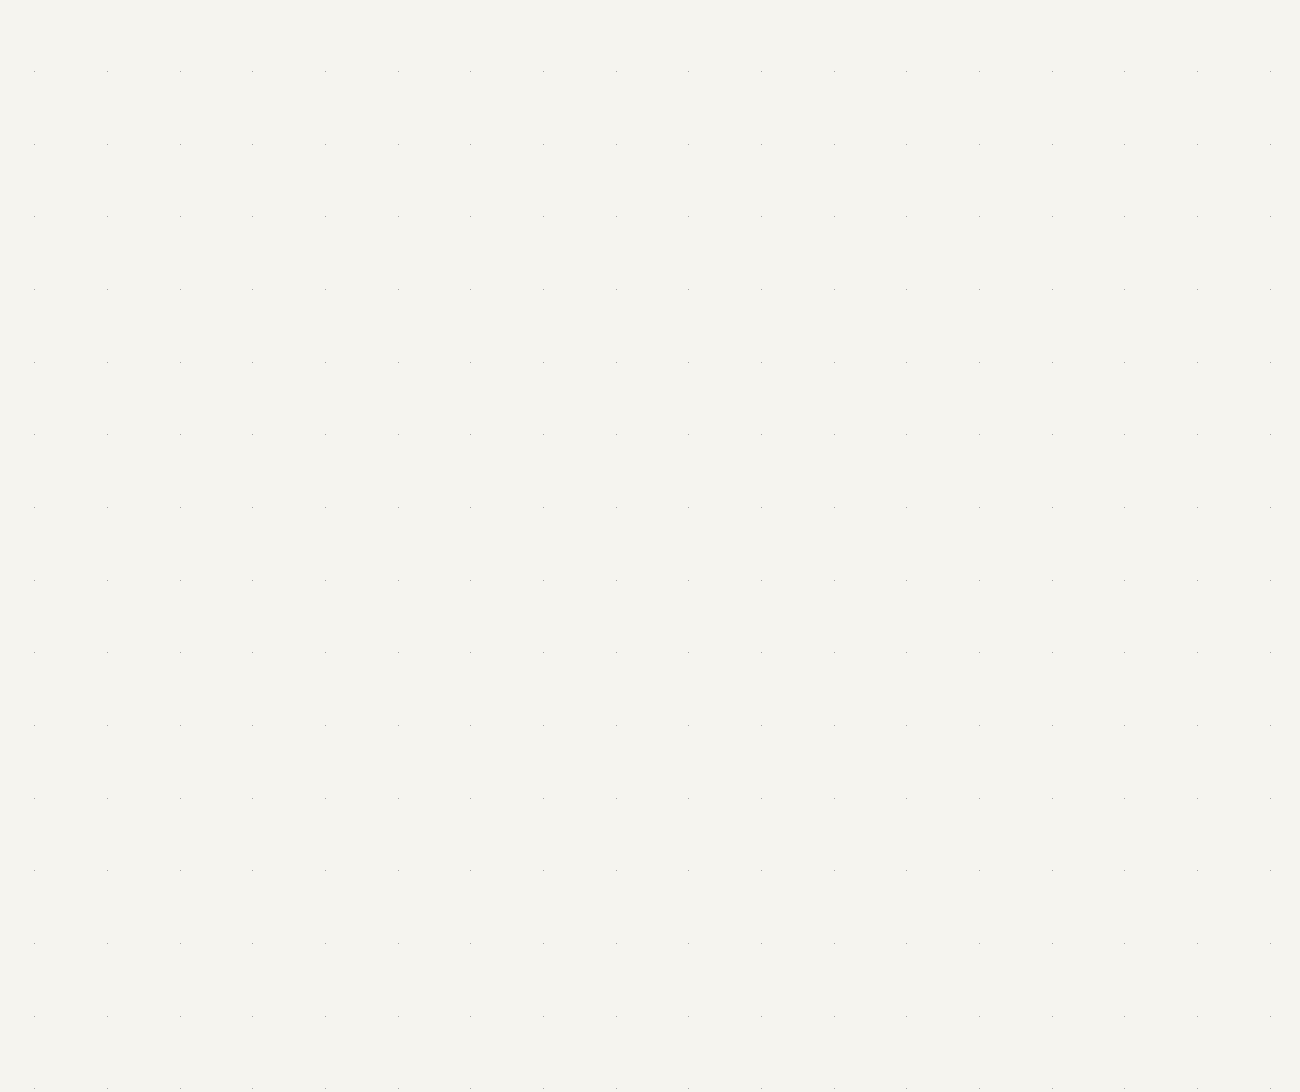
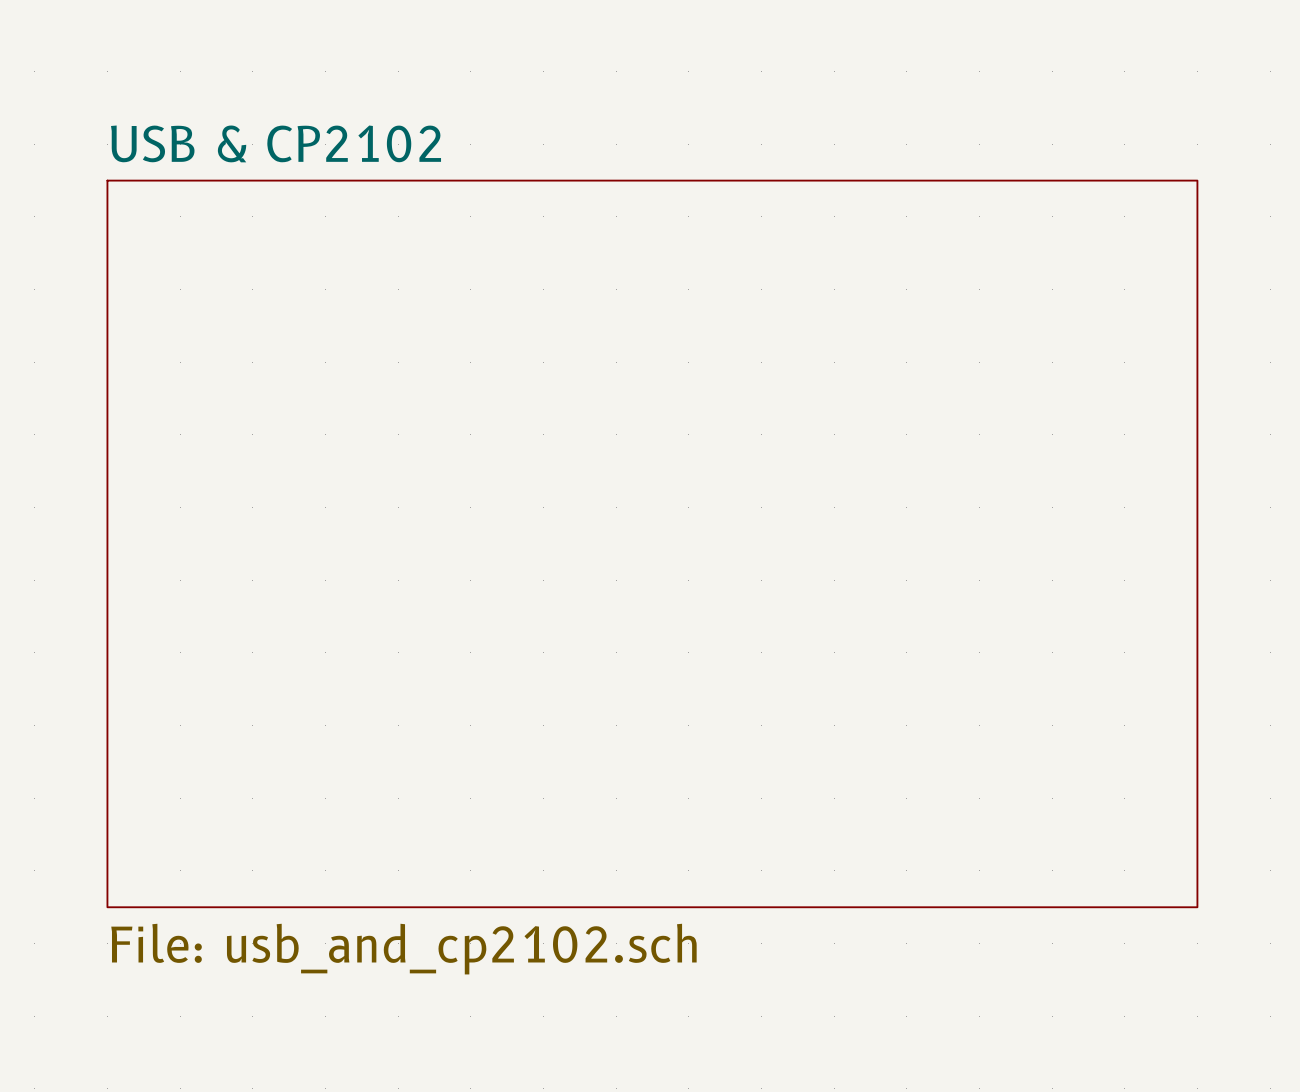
sheet USB & CP2102: none -> File: usb_and_cp2102.sch (652, 543)

